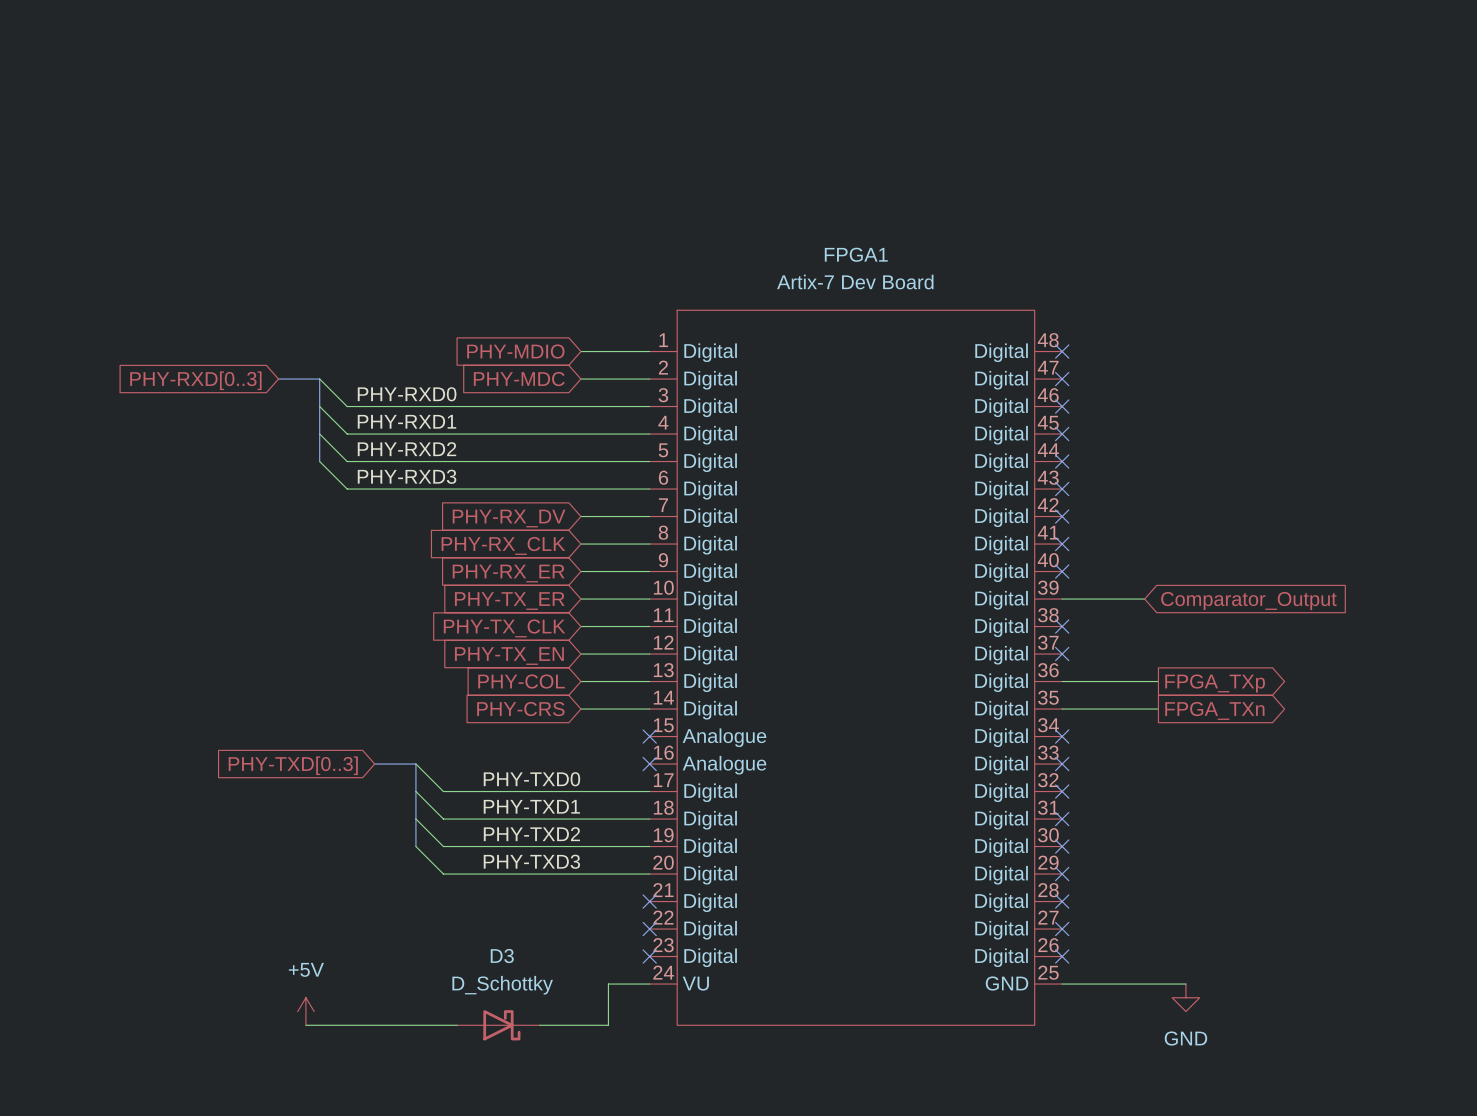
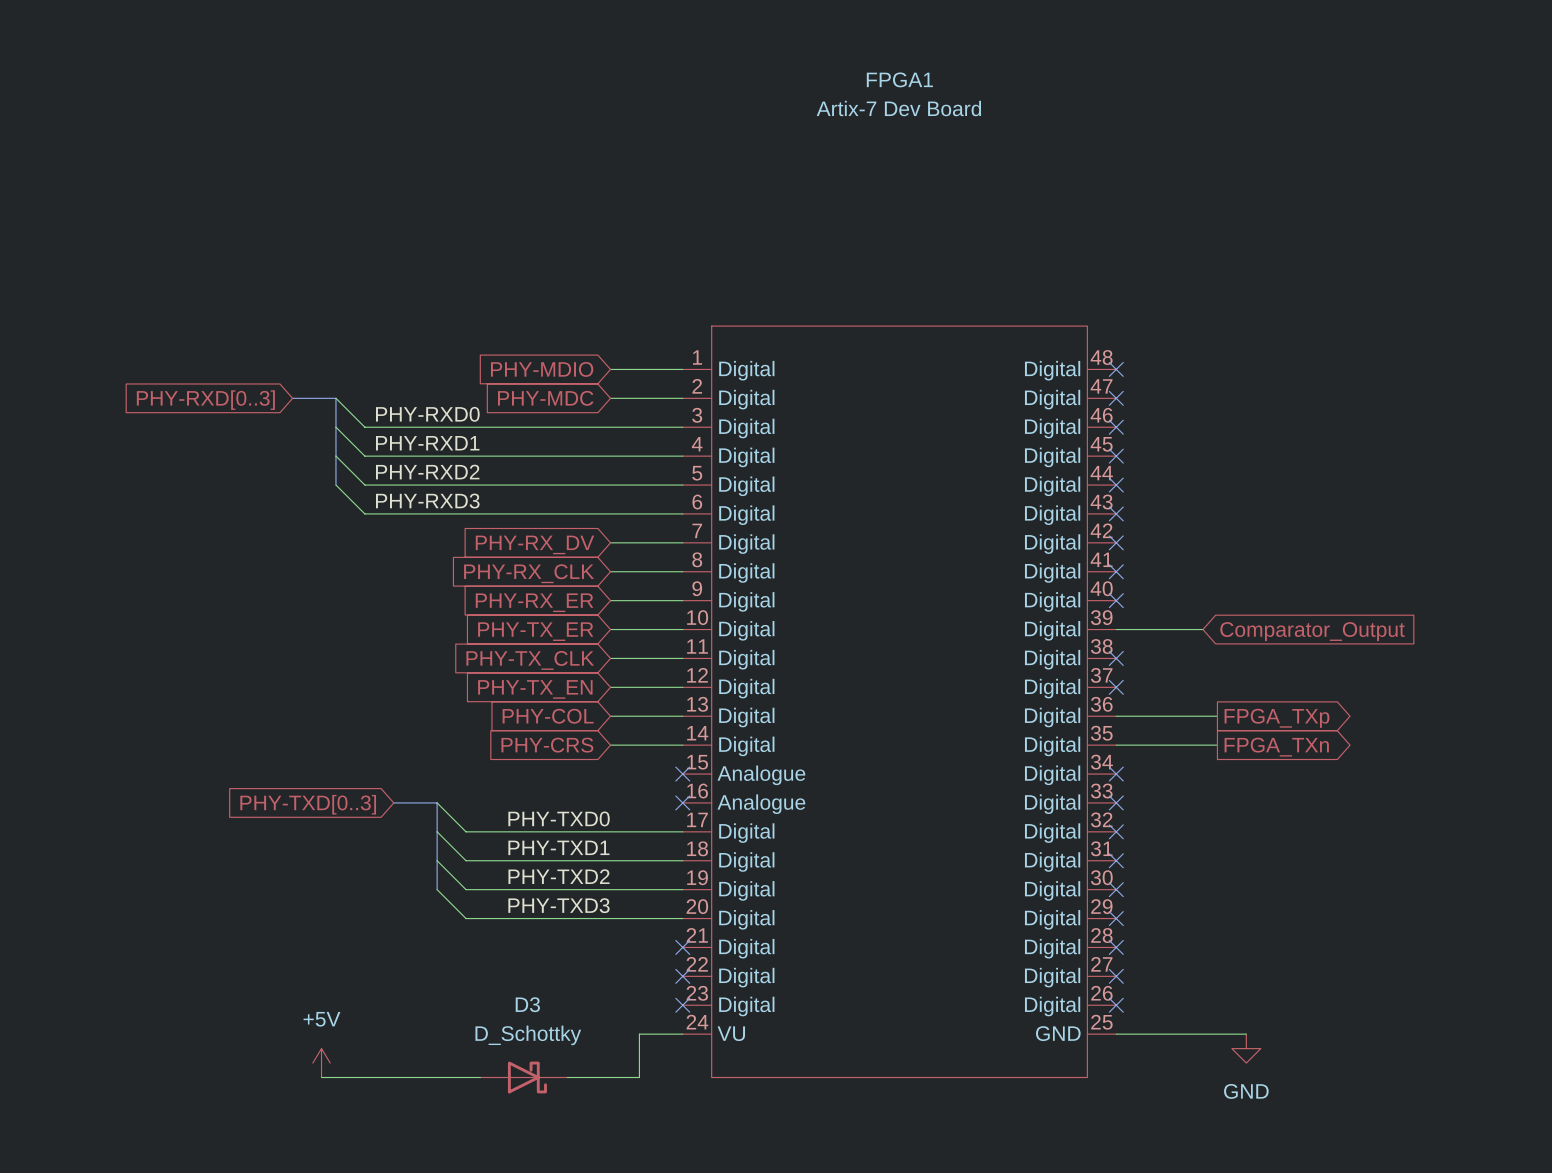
FPGA1 name position: FPGA1 (856, 254) -> FPGA1 (899, 79)
FPGA1 value position: Artix-7 Dev Board (855, 282) -> Artix-7 Dev Board (898, 108)

